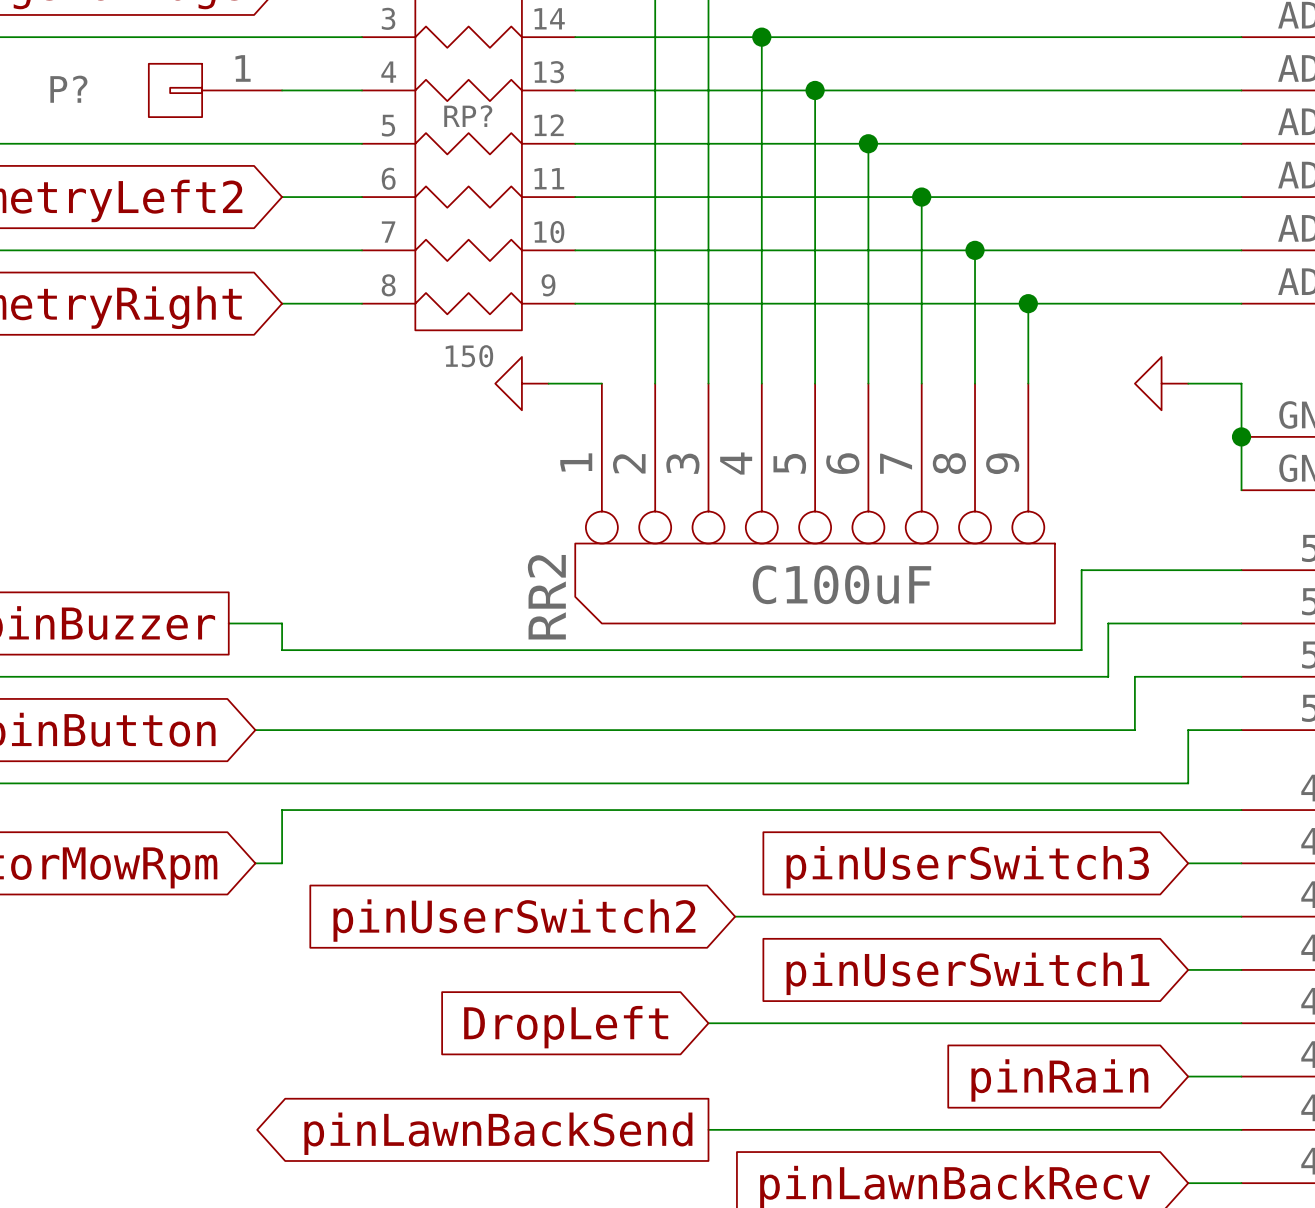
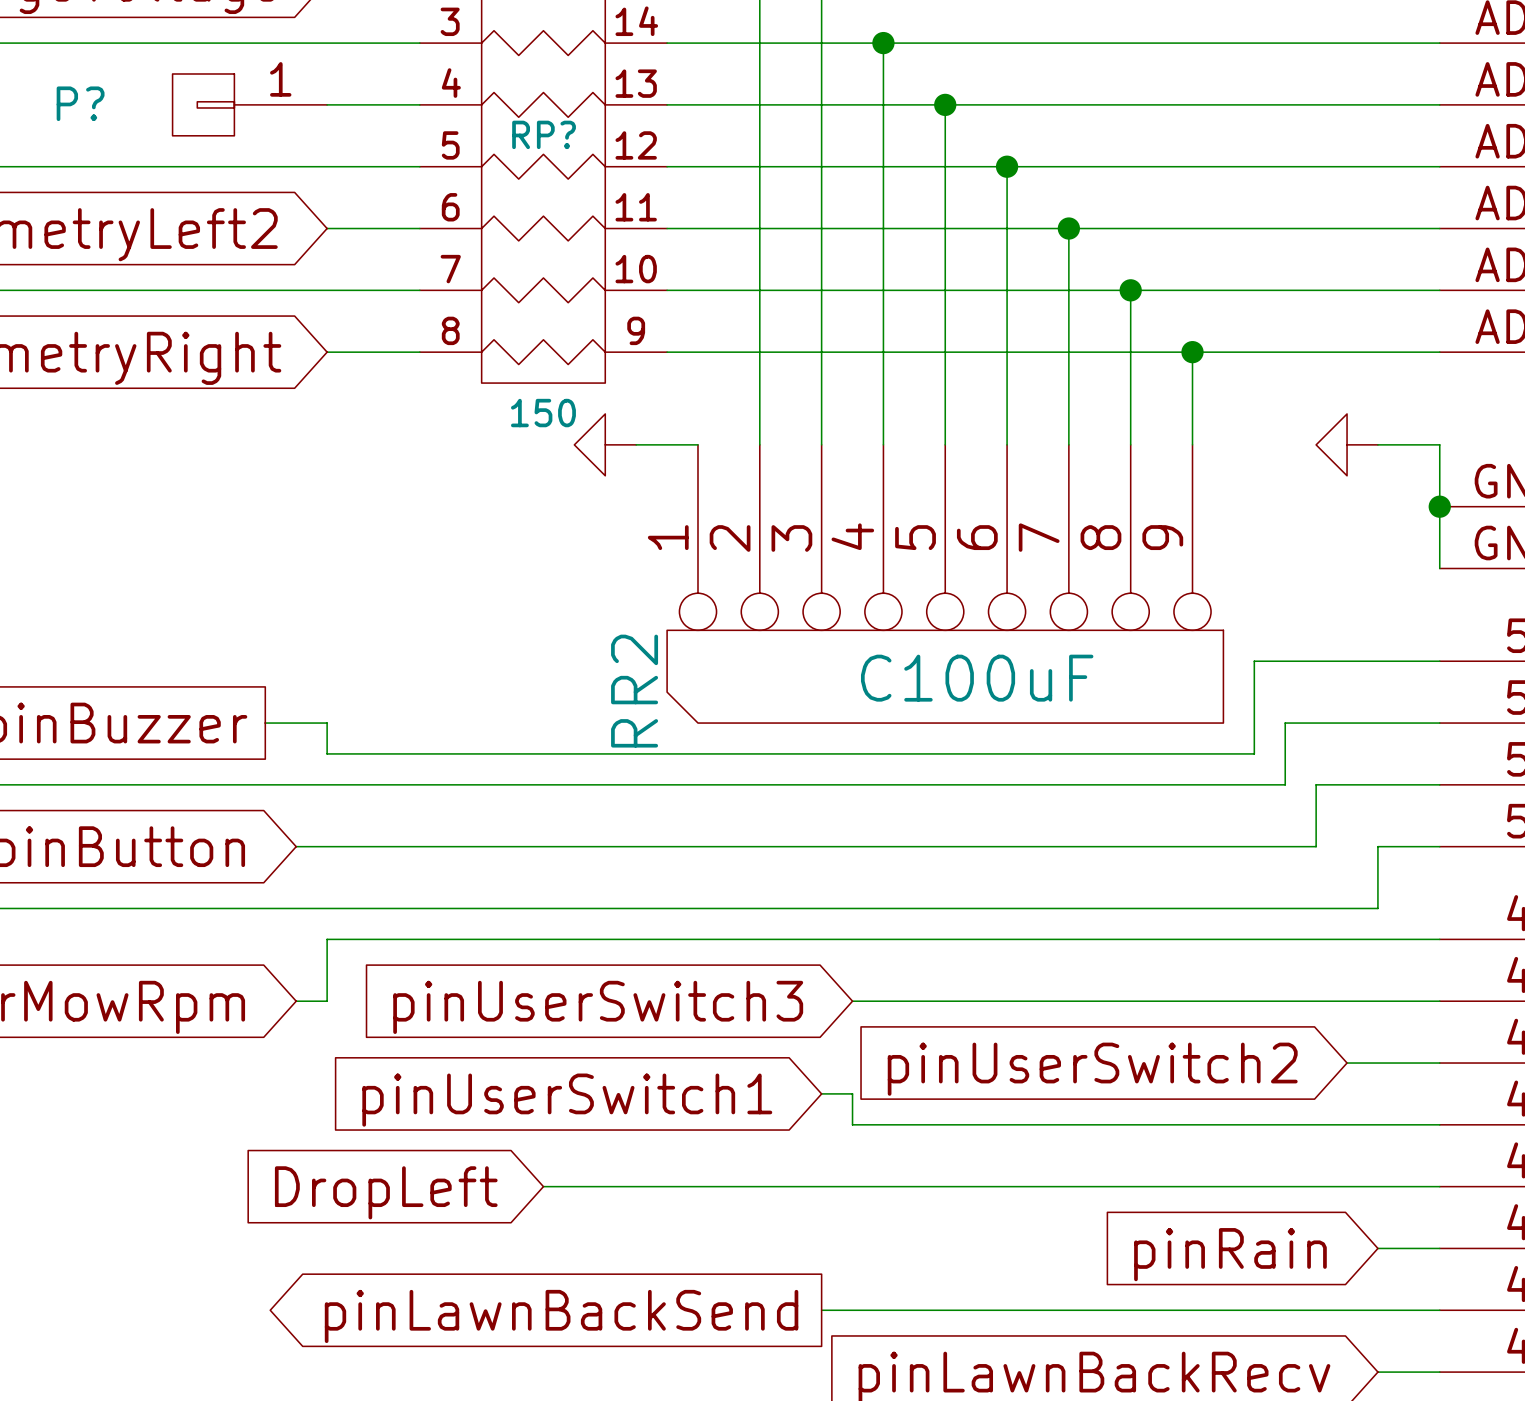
wire: none -> (852, 1001) (1377, 1001)
global label position: pinUserSwitch3 (967, 867) -> pinUserSwitch3 (598, 1007)
wire: (735, 916) (1161, 916) -> none
global label position: pinUserSwitch2 (514, 920) -> pinUserSwitch2 (1092, 1069)
wire: none -> (821, 1093) (852, 1093) (852, 1124) (1377, 1124)
global label position: pinUserSwitch1 (967, 973) -> pinUserSwitch1 (567, 1100)
wire: none -> (543, 1186) (821, 1186)
global label position: DropLeft (566, 1027) -> DropLeft (386, 1192)

